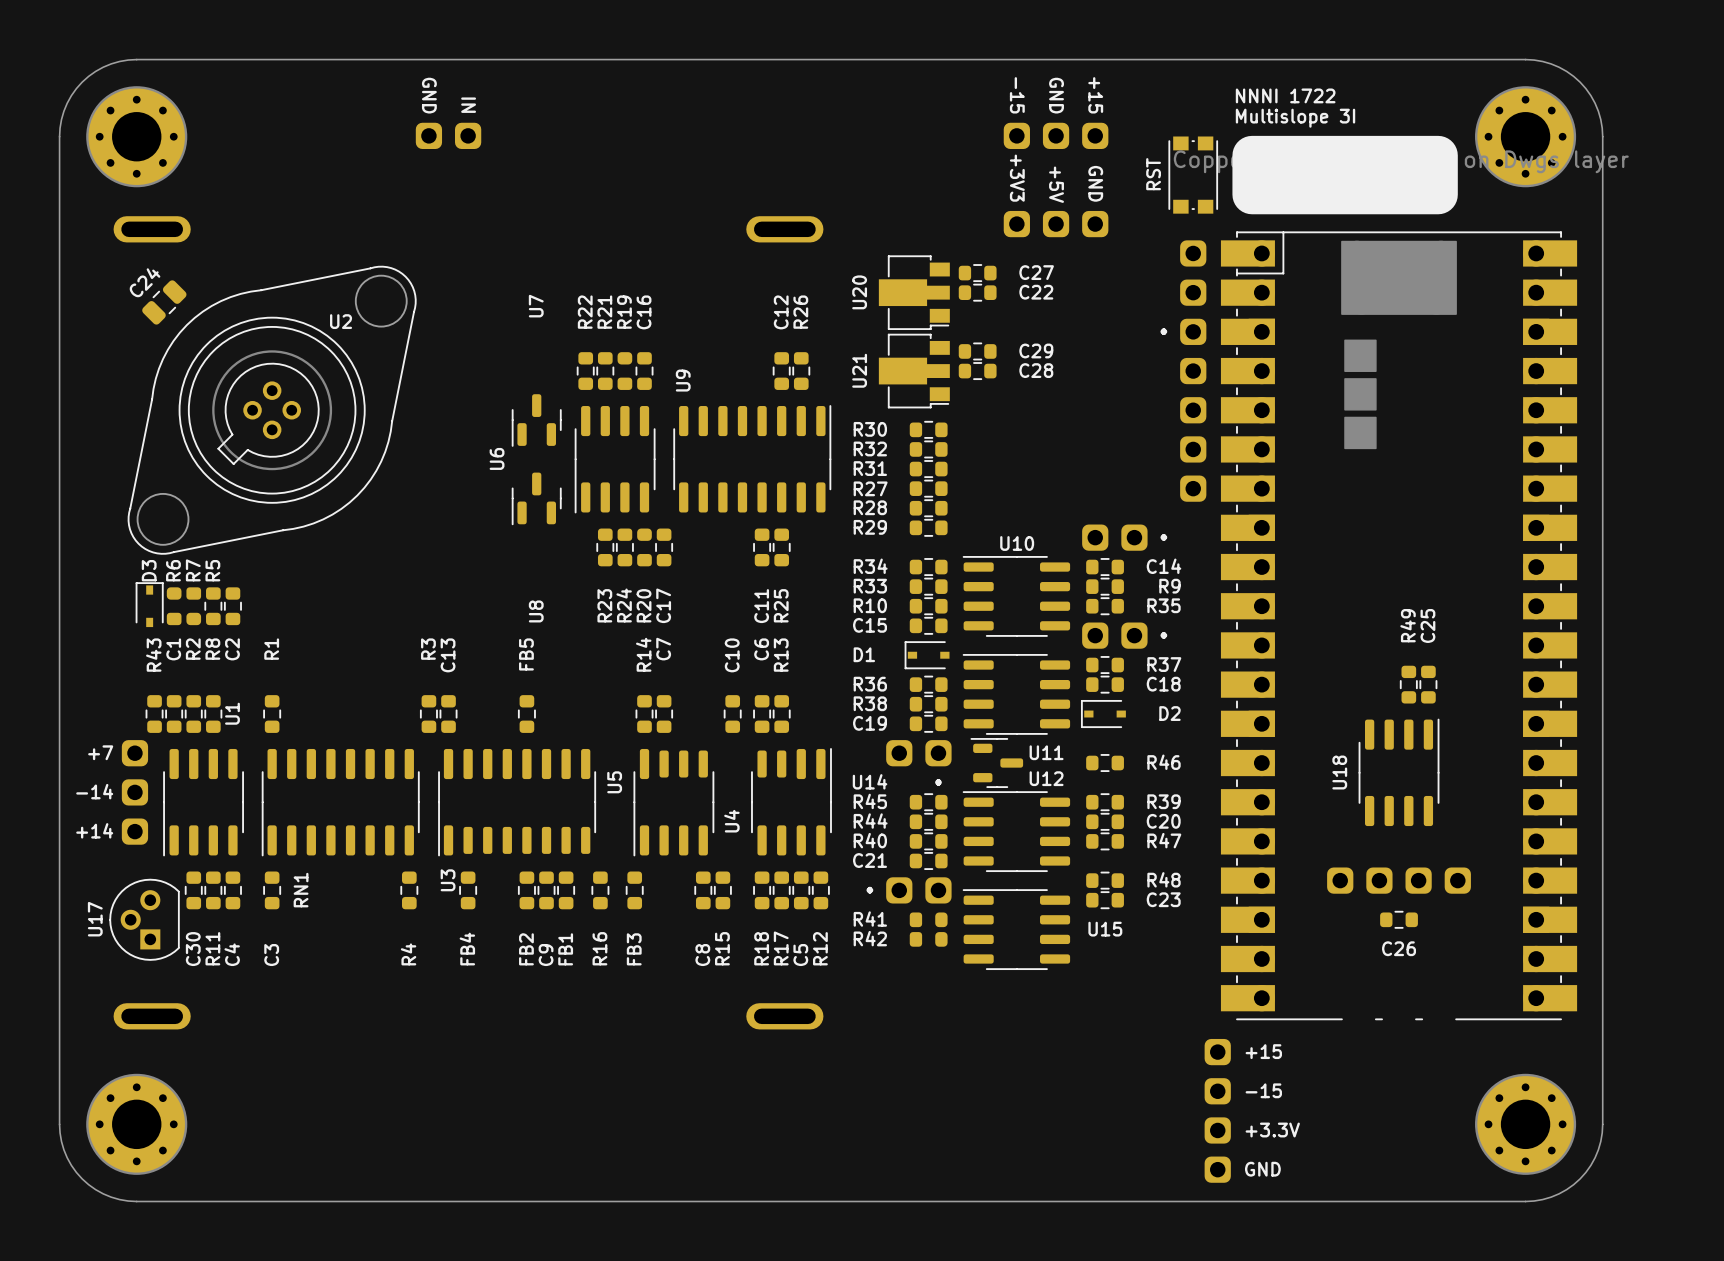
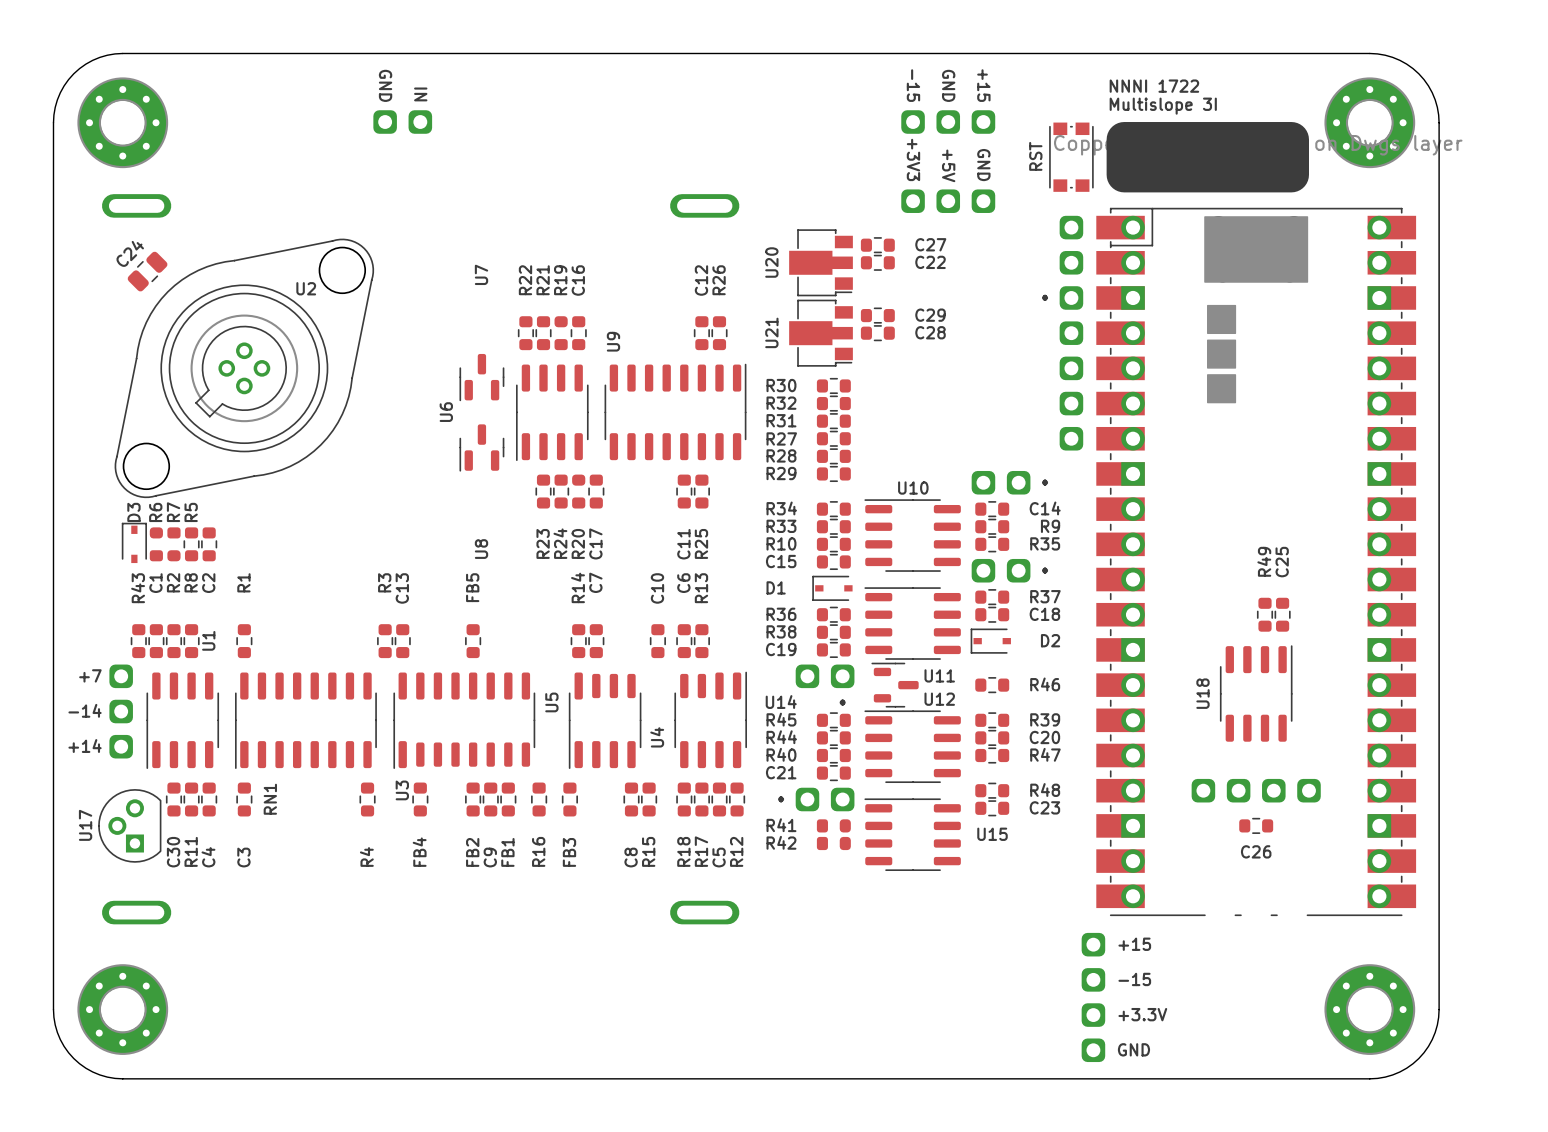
drawing: none -> [98, 98, 147, 147]
drawing: none -> [1345, 98, 1394, 147]
drawing: none -> [98, 985, 147, 1034]
drawing: none -> [1345, 985, 1394, 1034]

